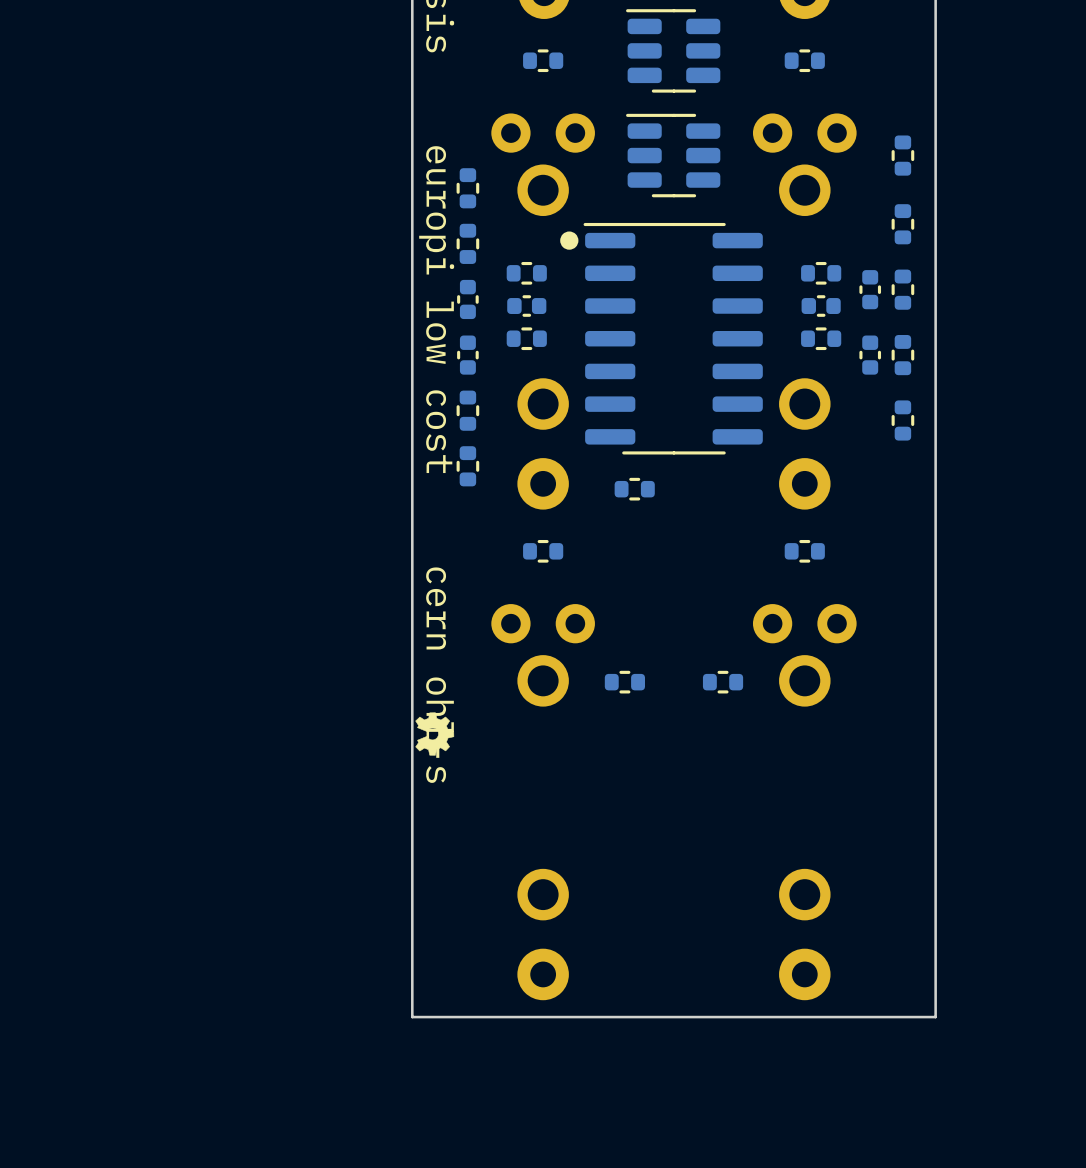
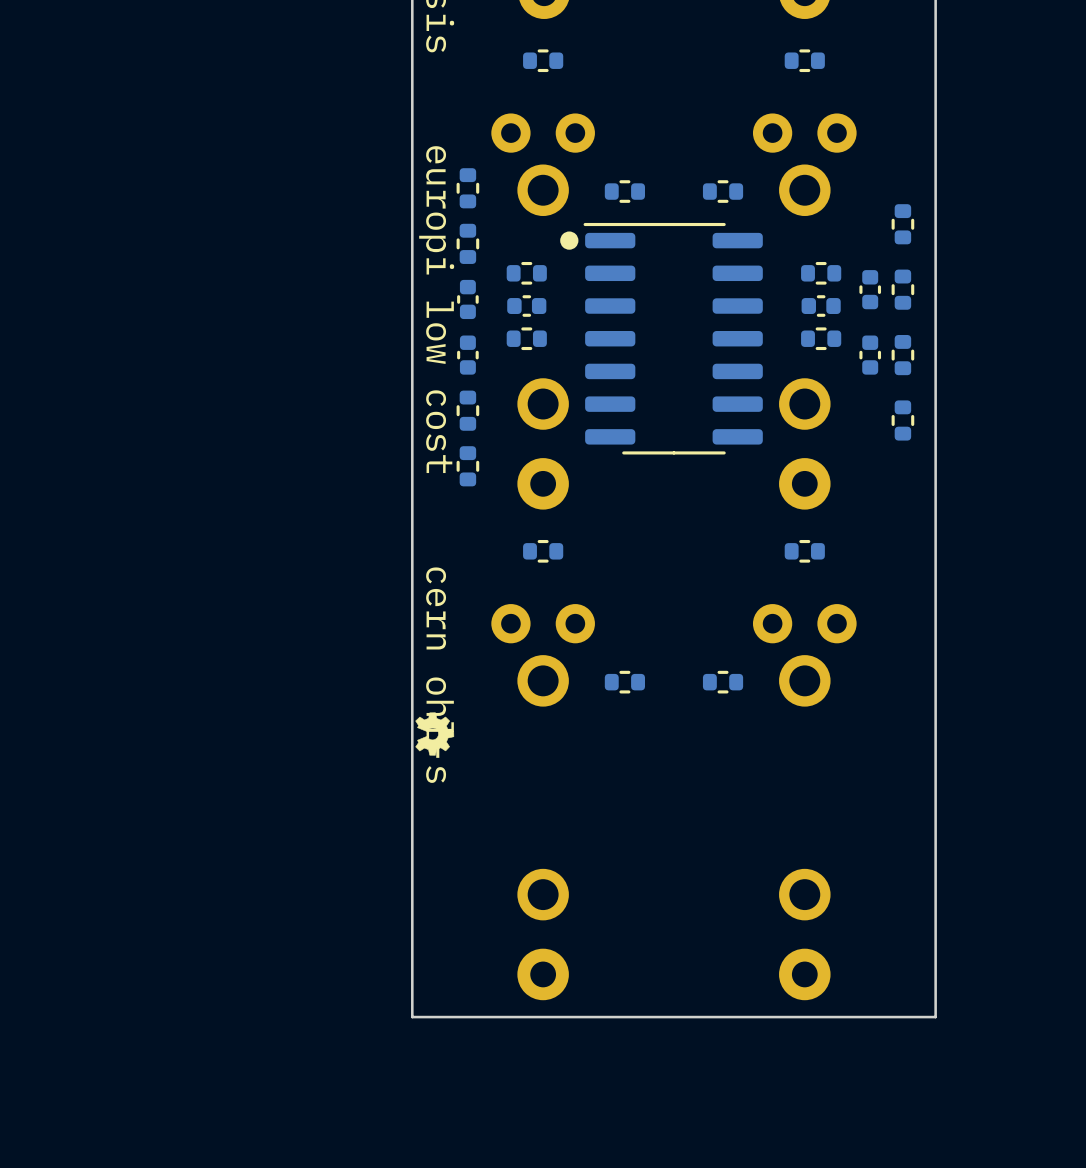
part: (673, 50) -> none
part: (673, 155) -> none
part: (902, 155) -> none
part: none -> (624, 191)
part: none -> (723, 191)
part: (634, 489) -> none

